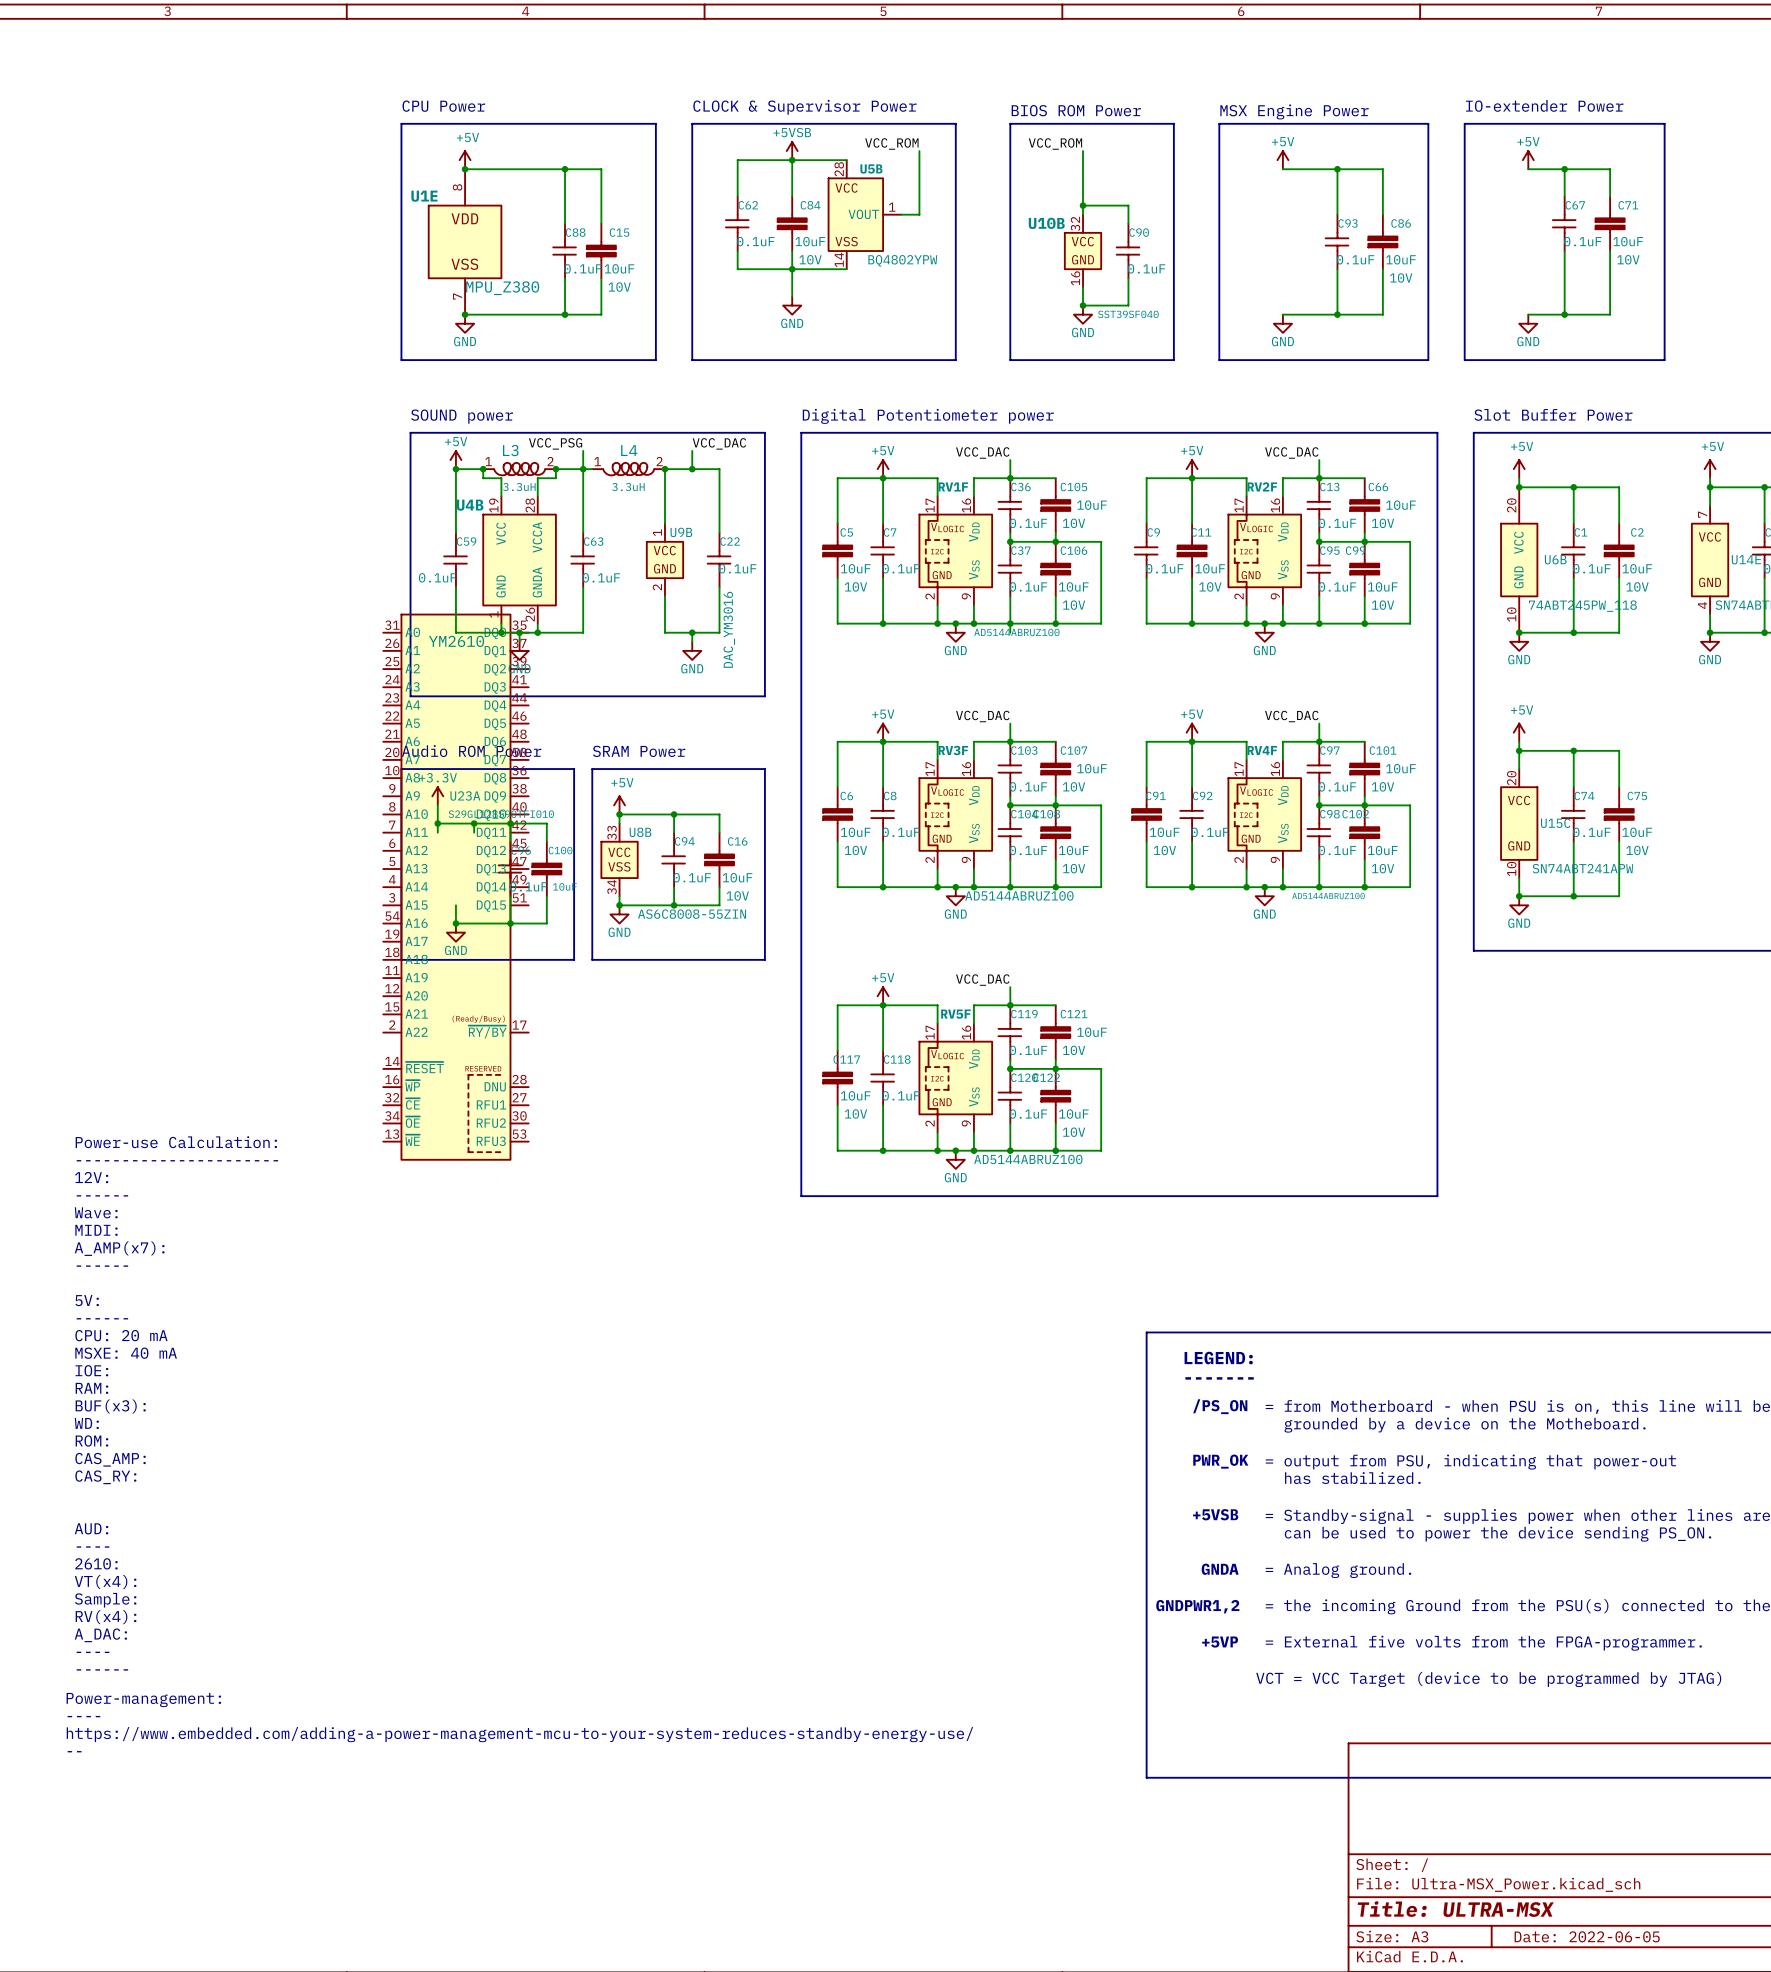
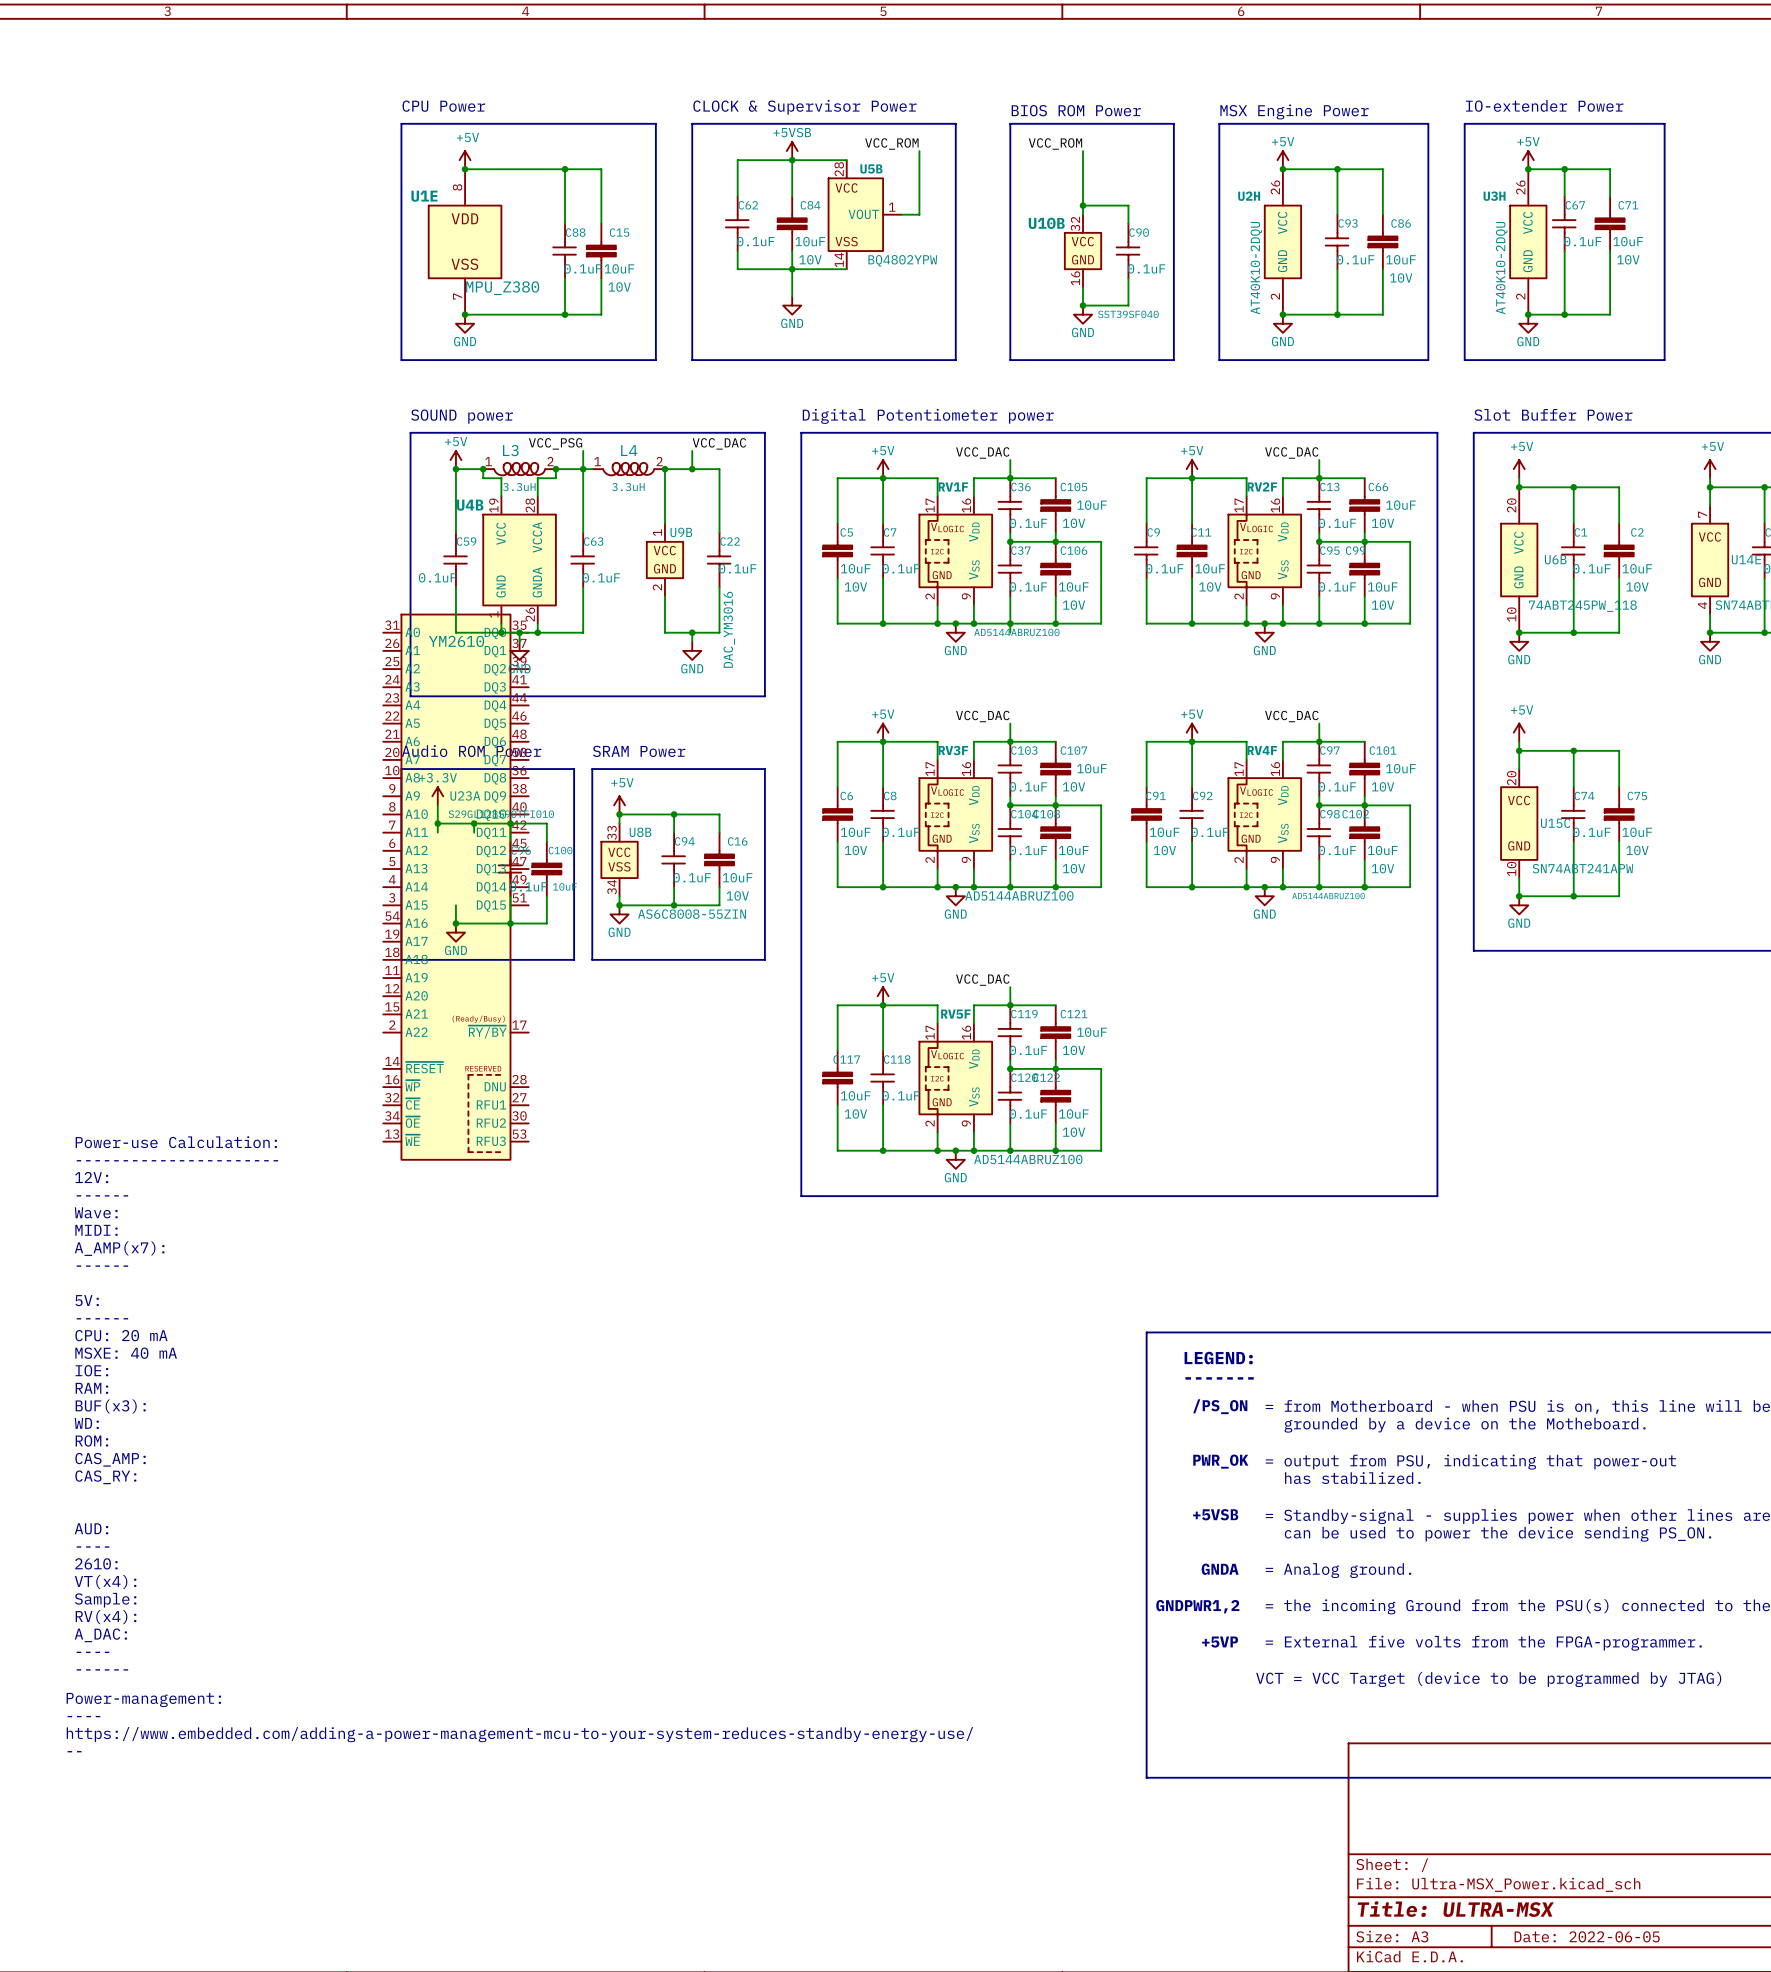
junction: none -> (1282, 169)
junction: none -> (1528, 169)
U2H: none -> AT40K10-2DQU (1282, 241)
U3H: none -> AT40K10-2DQU (1528, 241)
junction: none -> (1282, 314)
junction: none -> (1528, 314)

